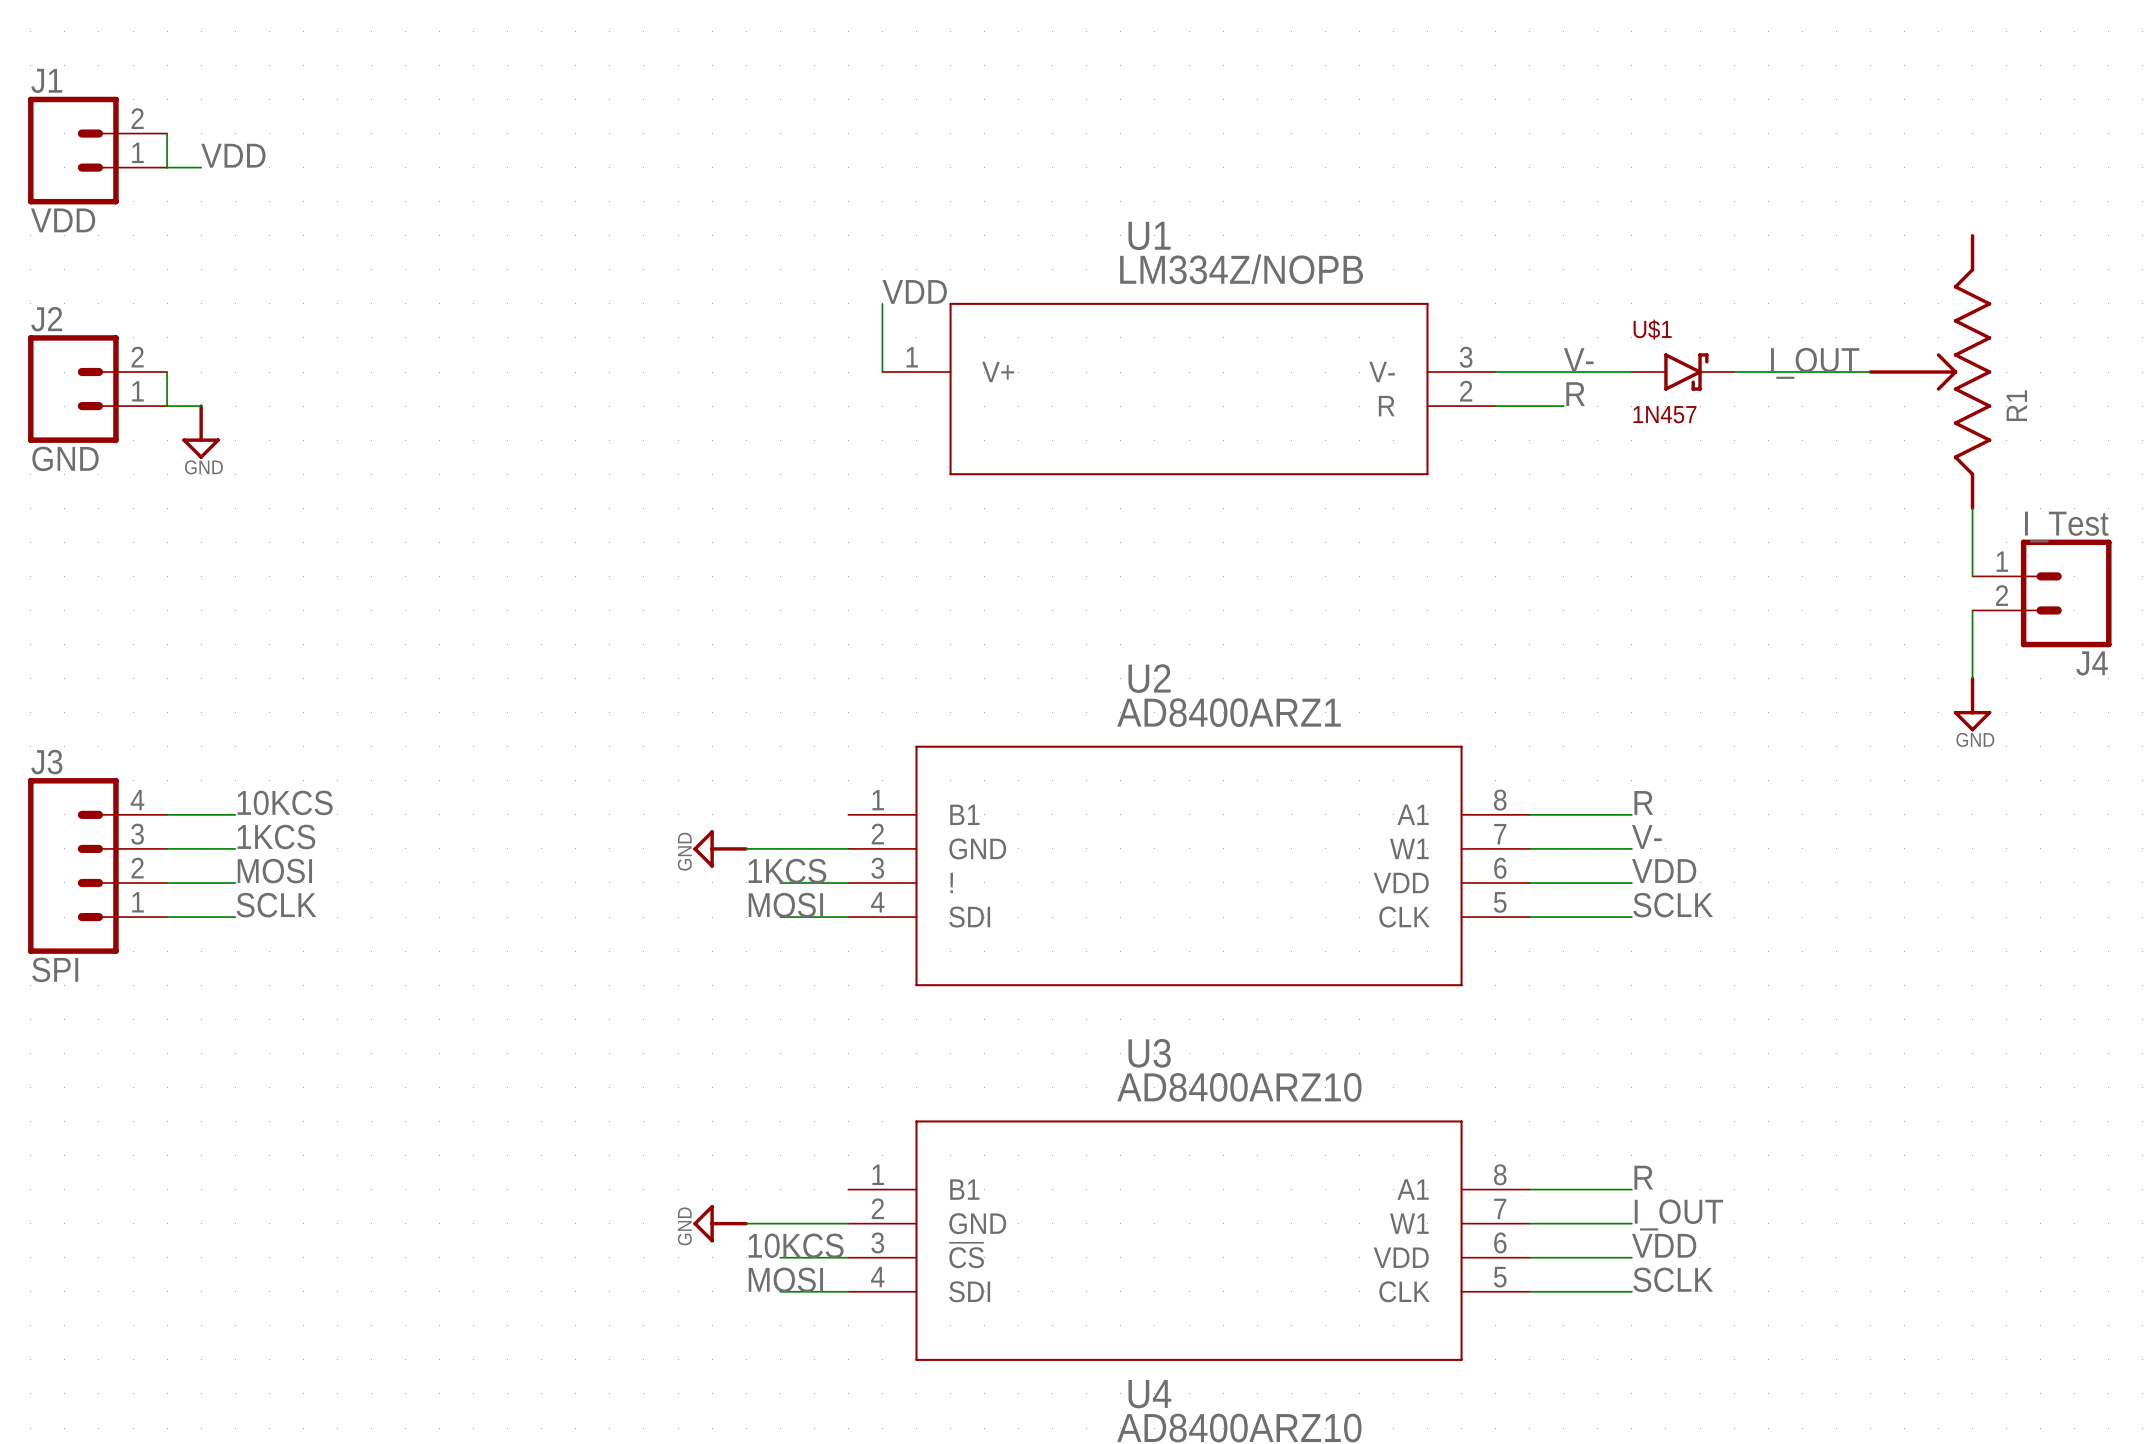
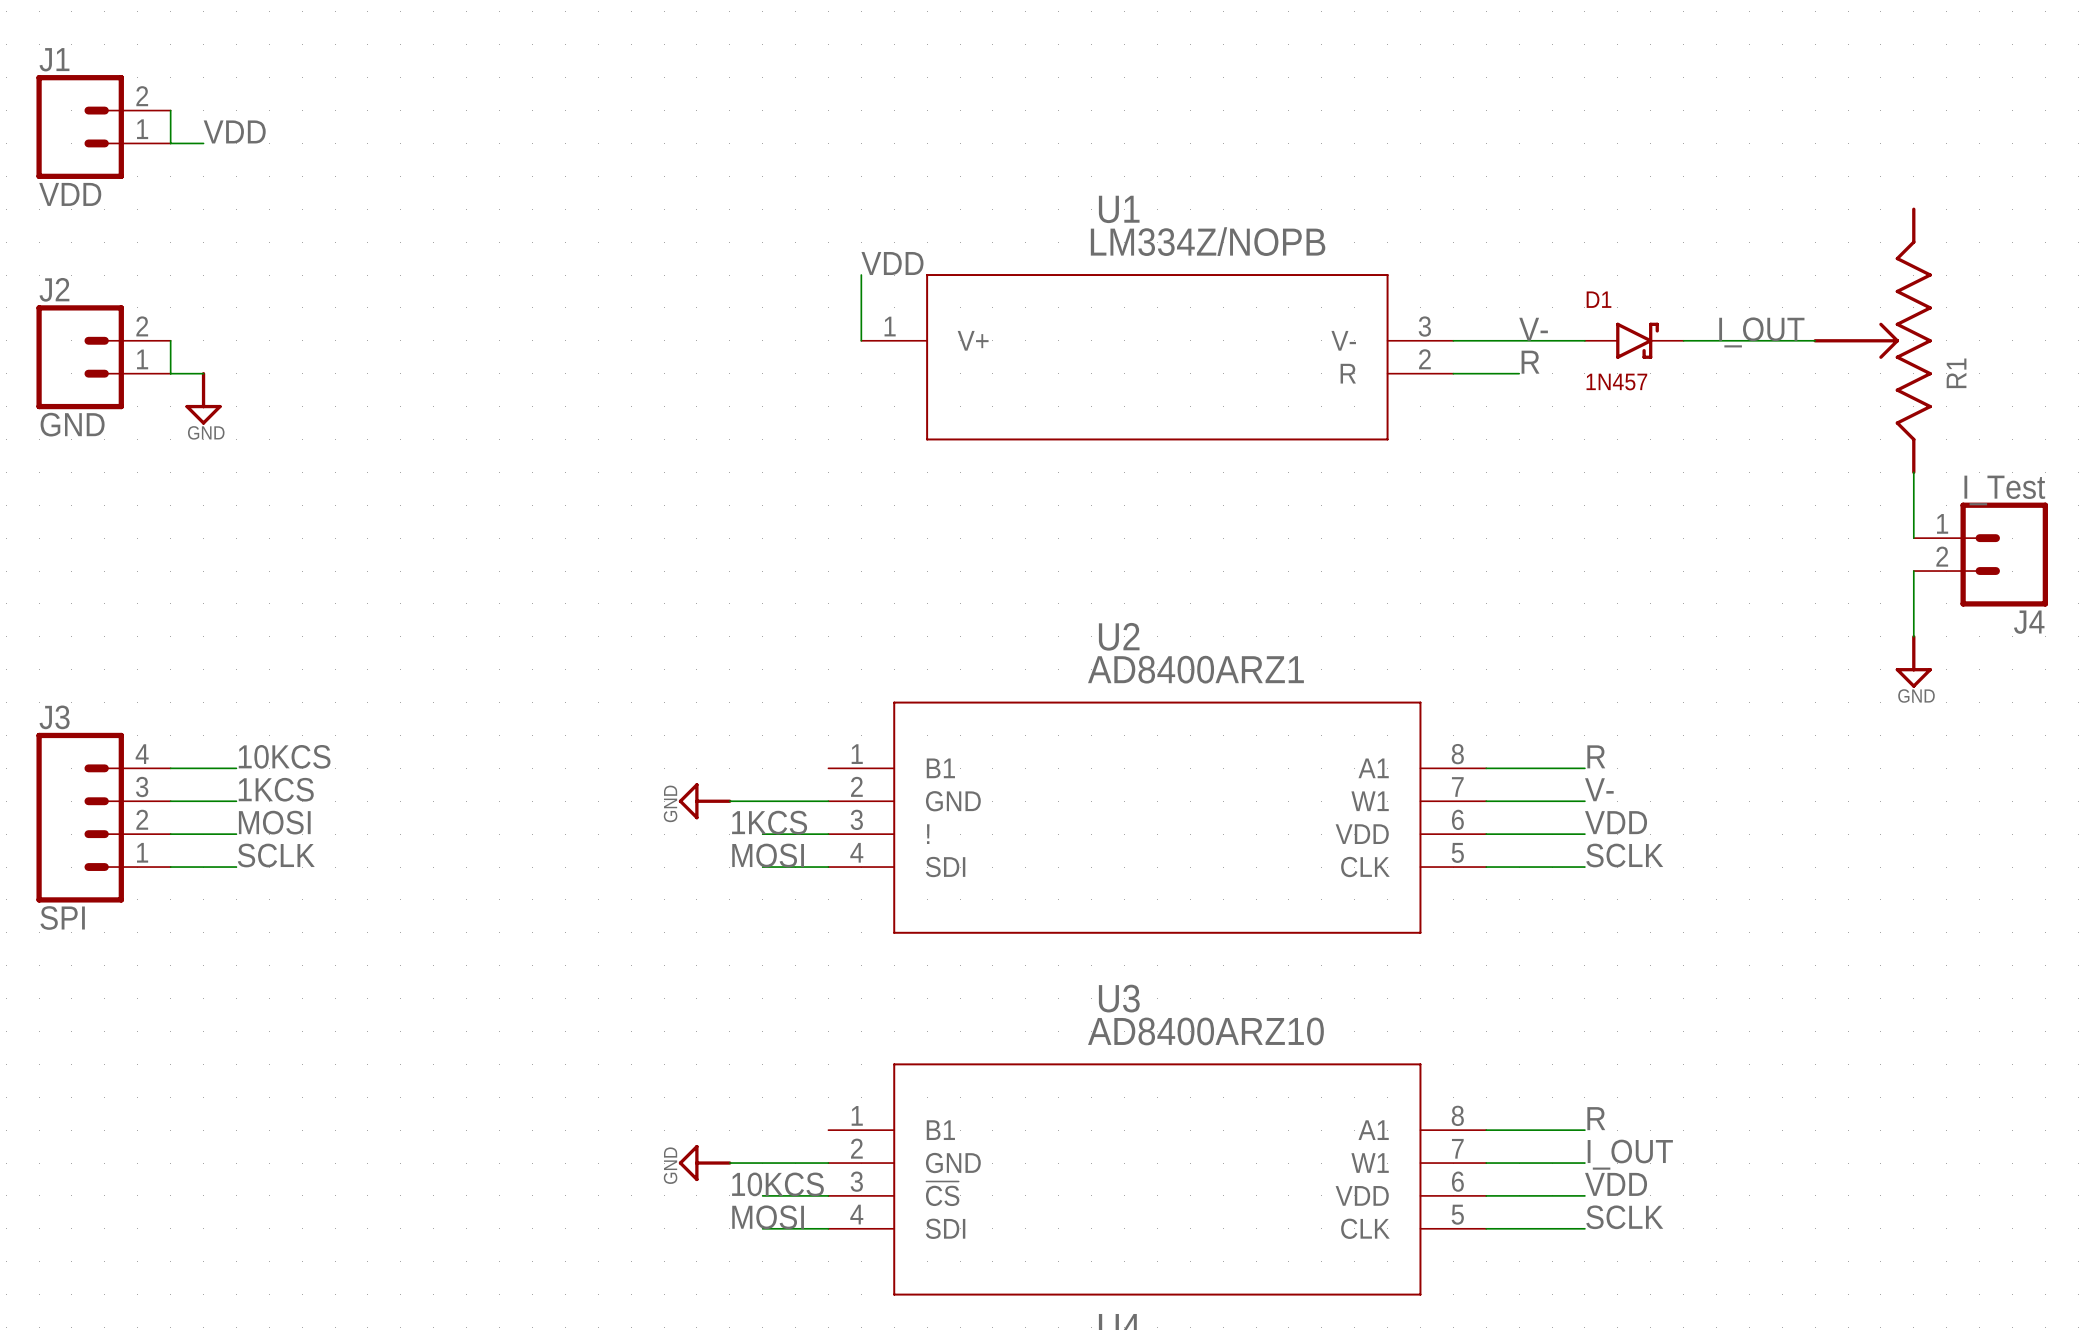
U$1 name: U$1 (1652, 329) -> D1 (1599, 299)

